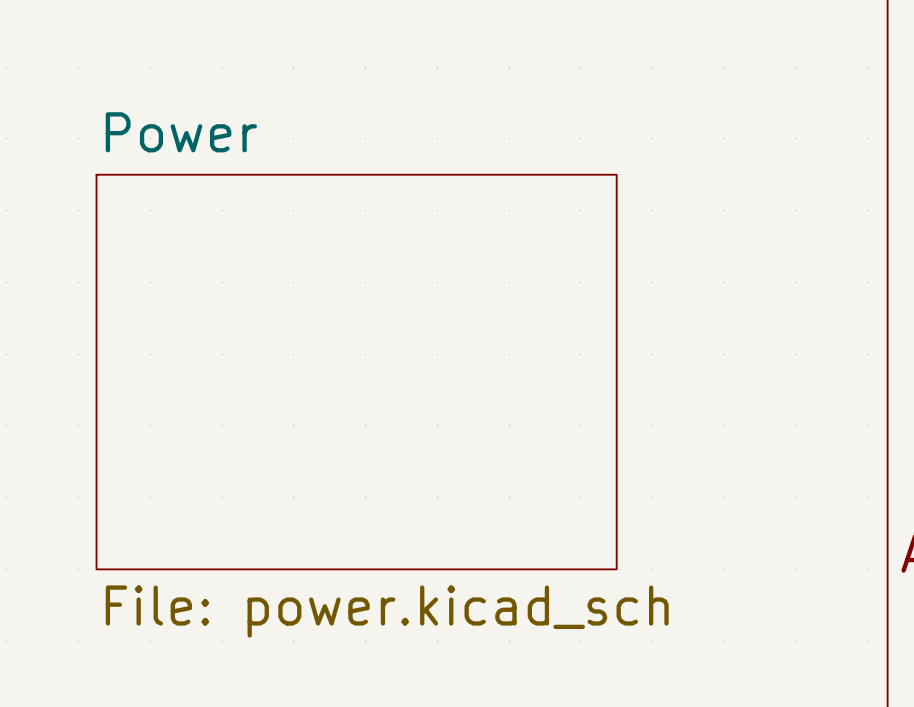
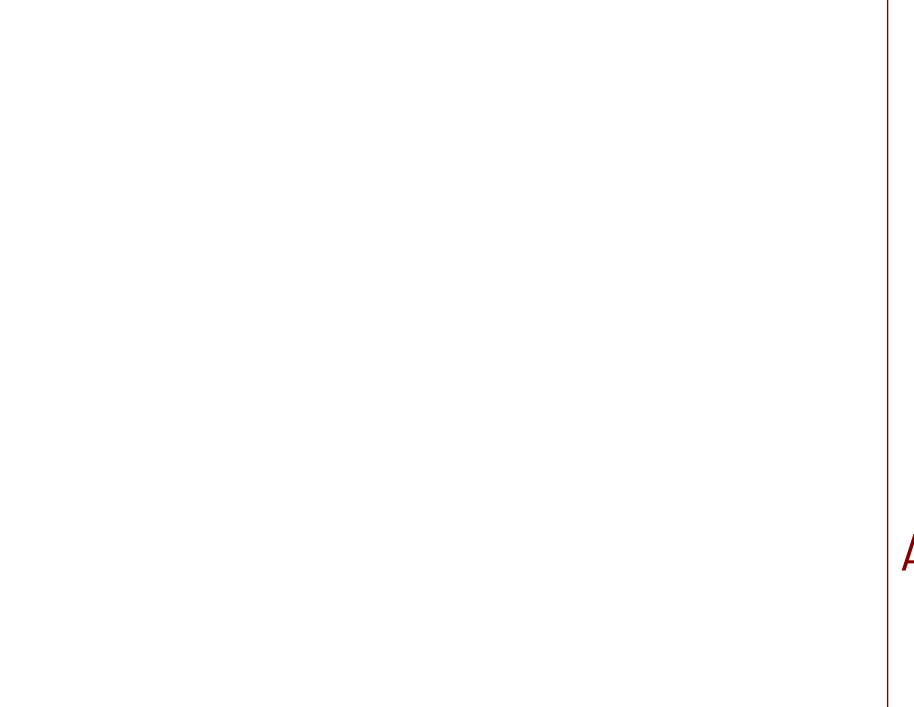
sheet Power: File: power.kicad_sch (356, 372) -> none

